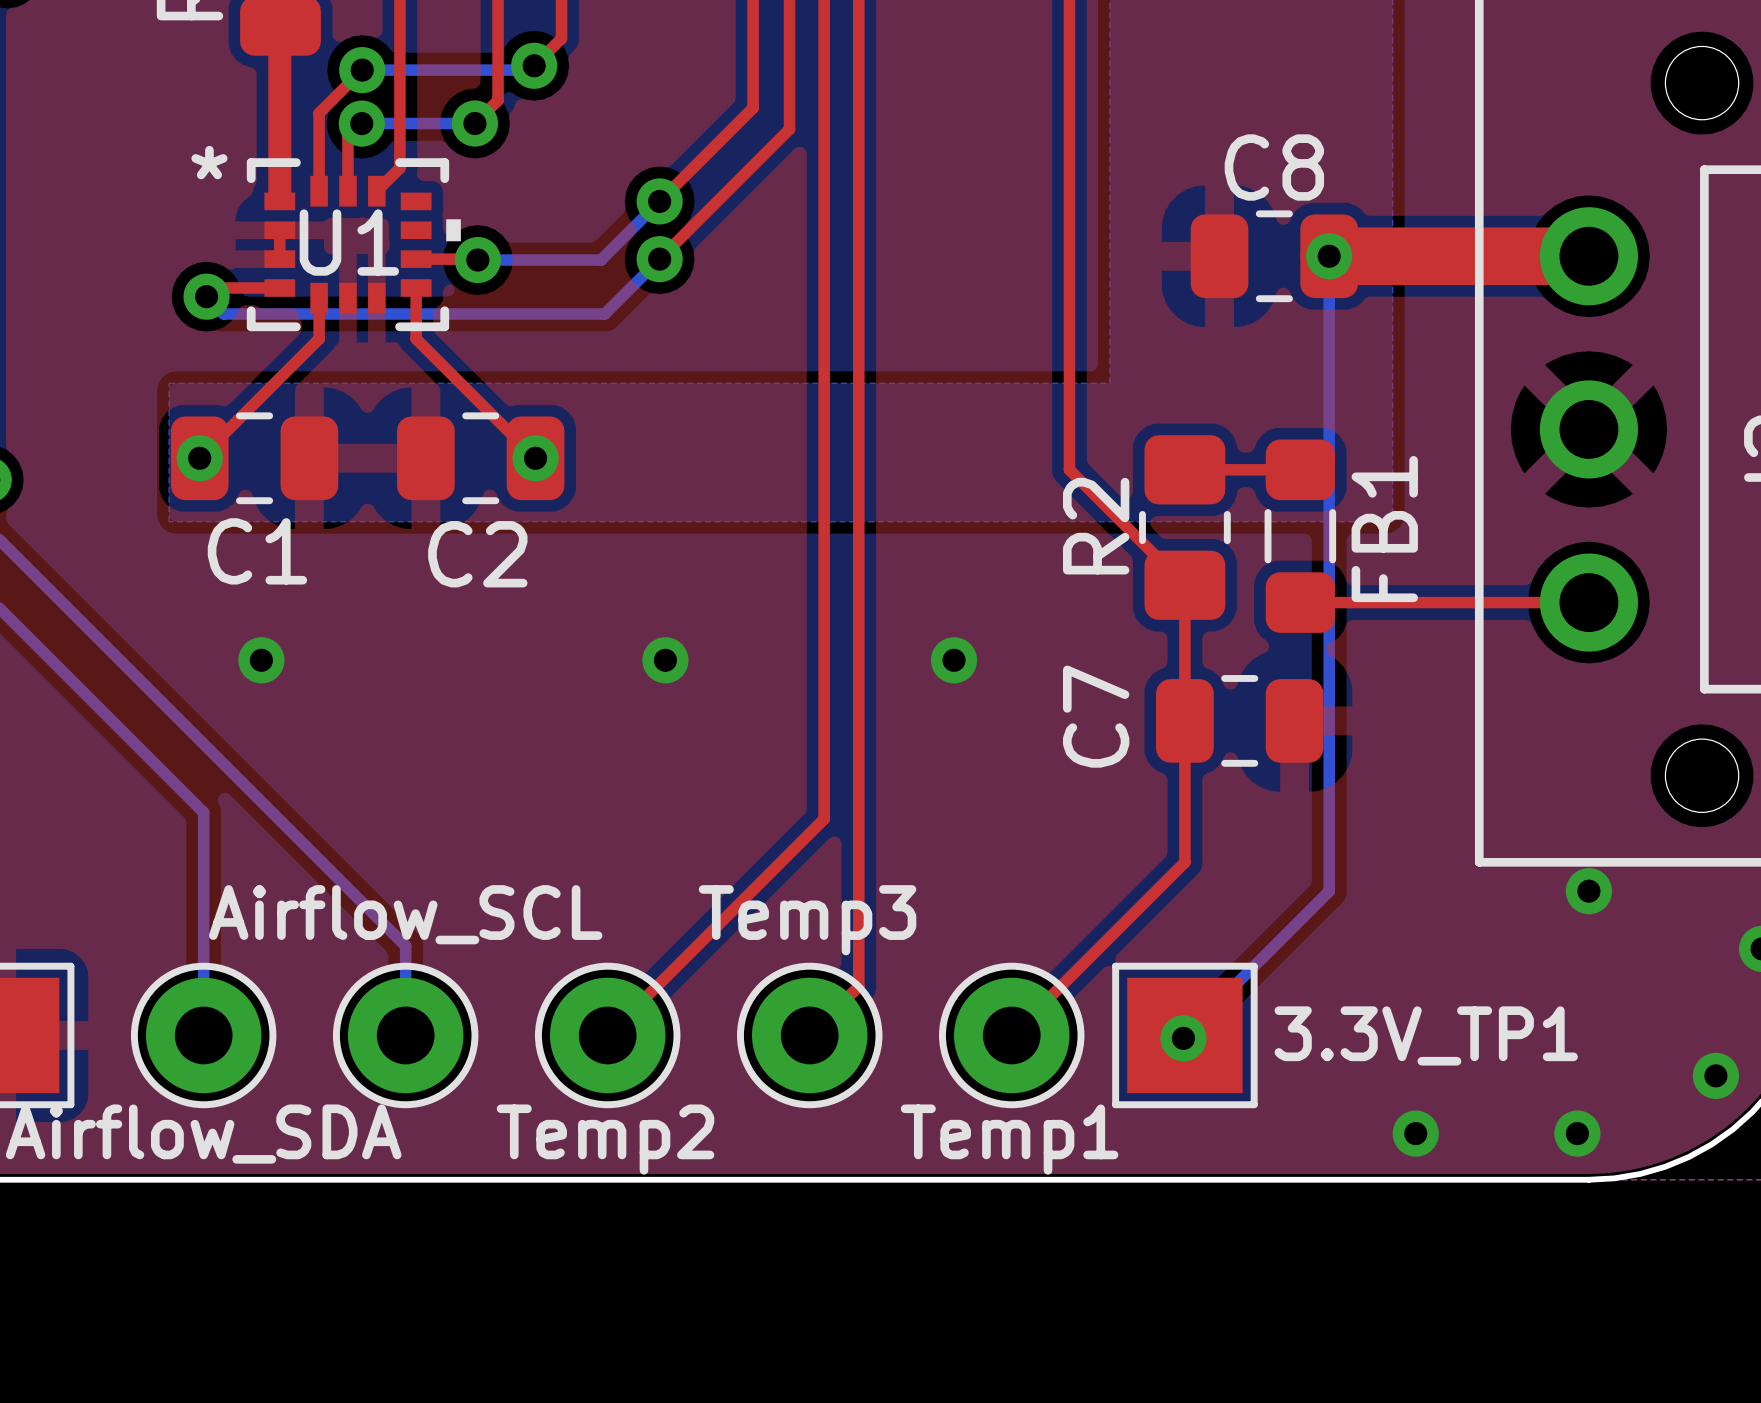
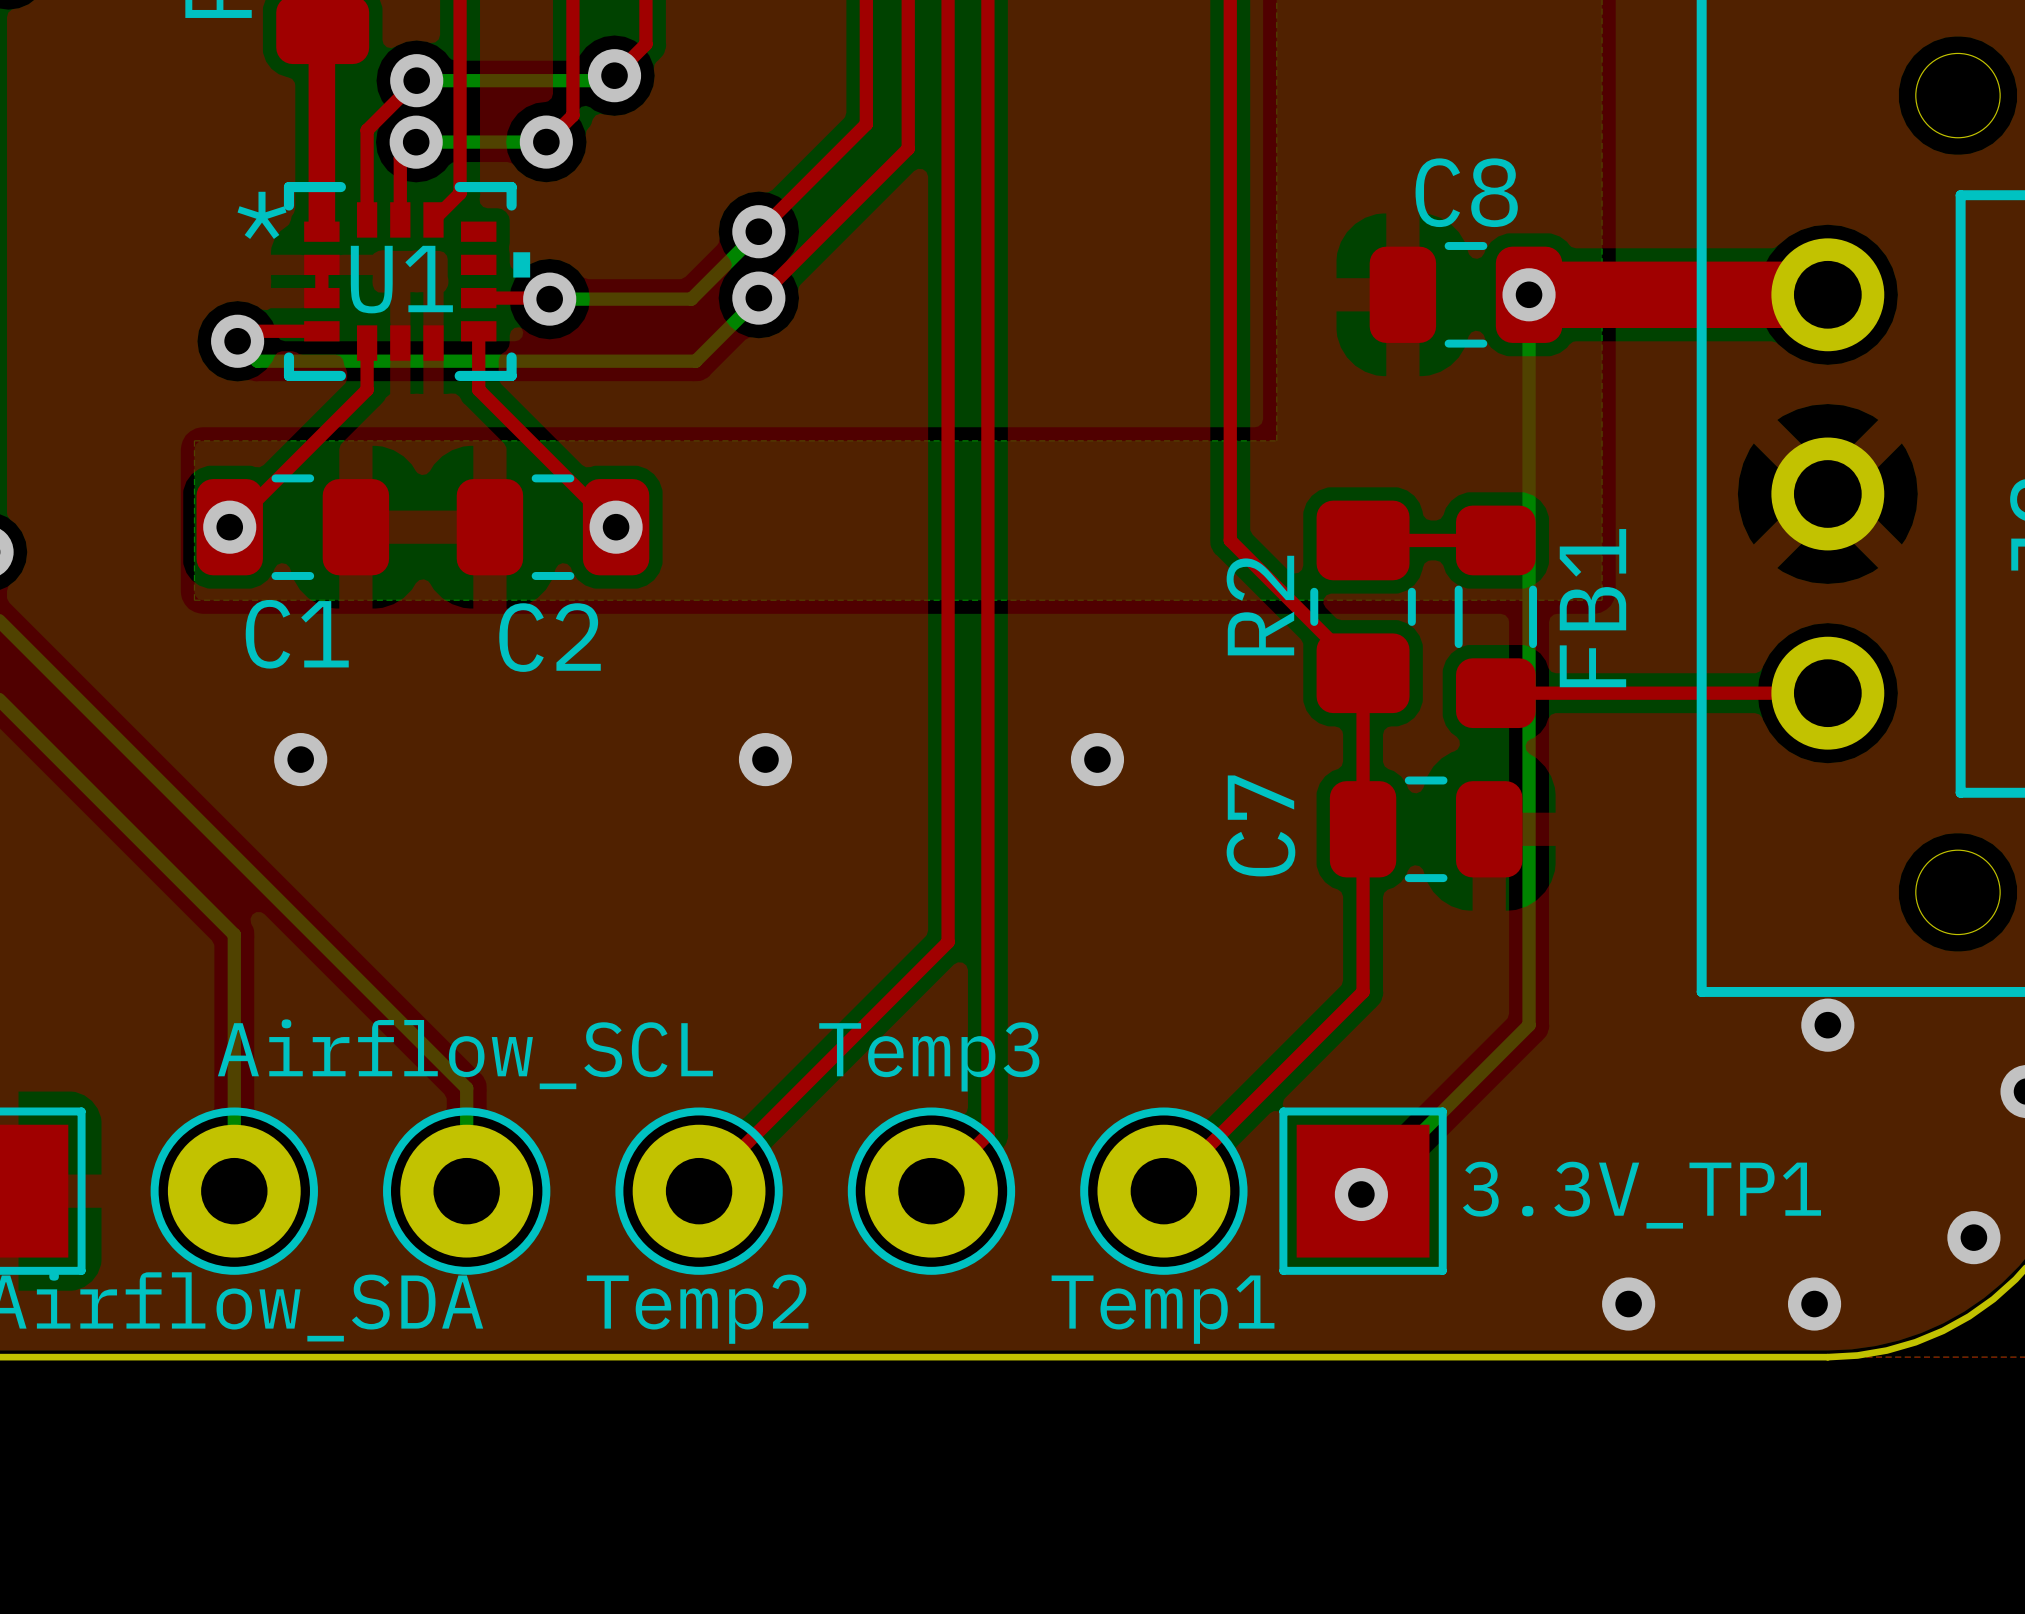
U1 text position: * (209, 162) -> * (262, 215)

